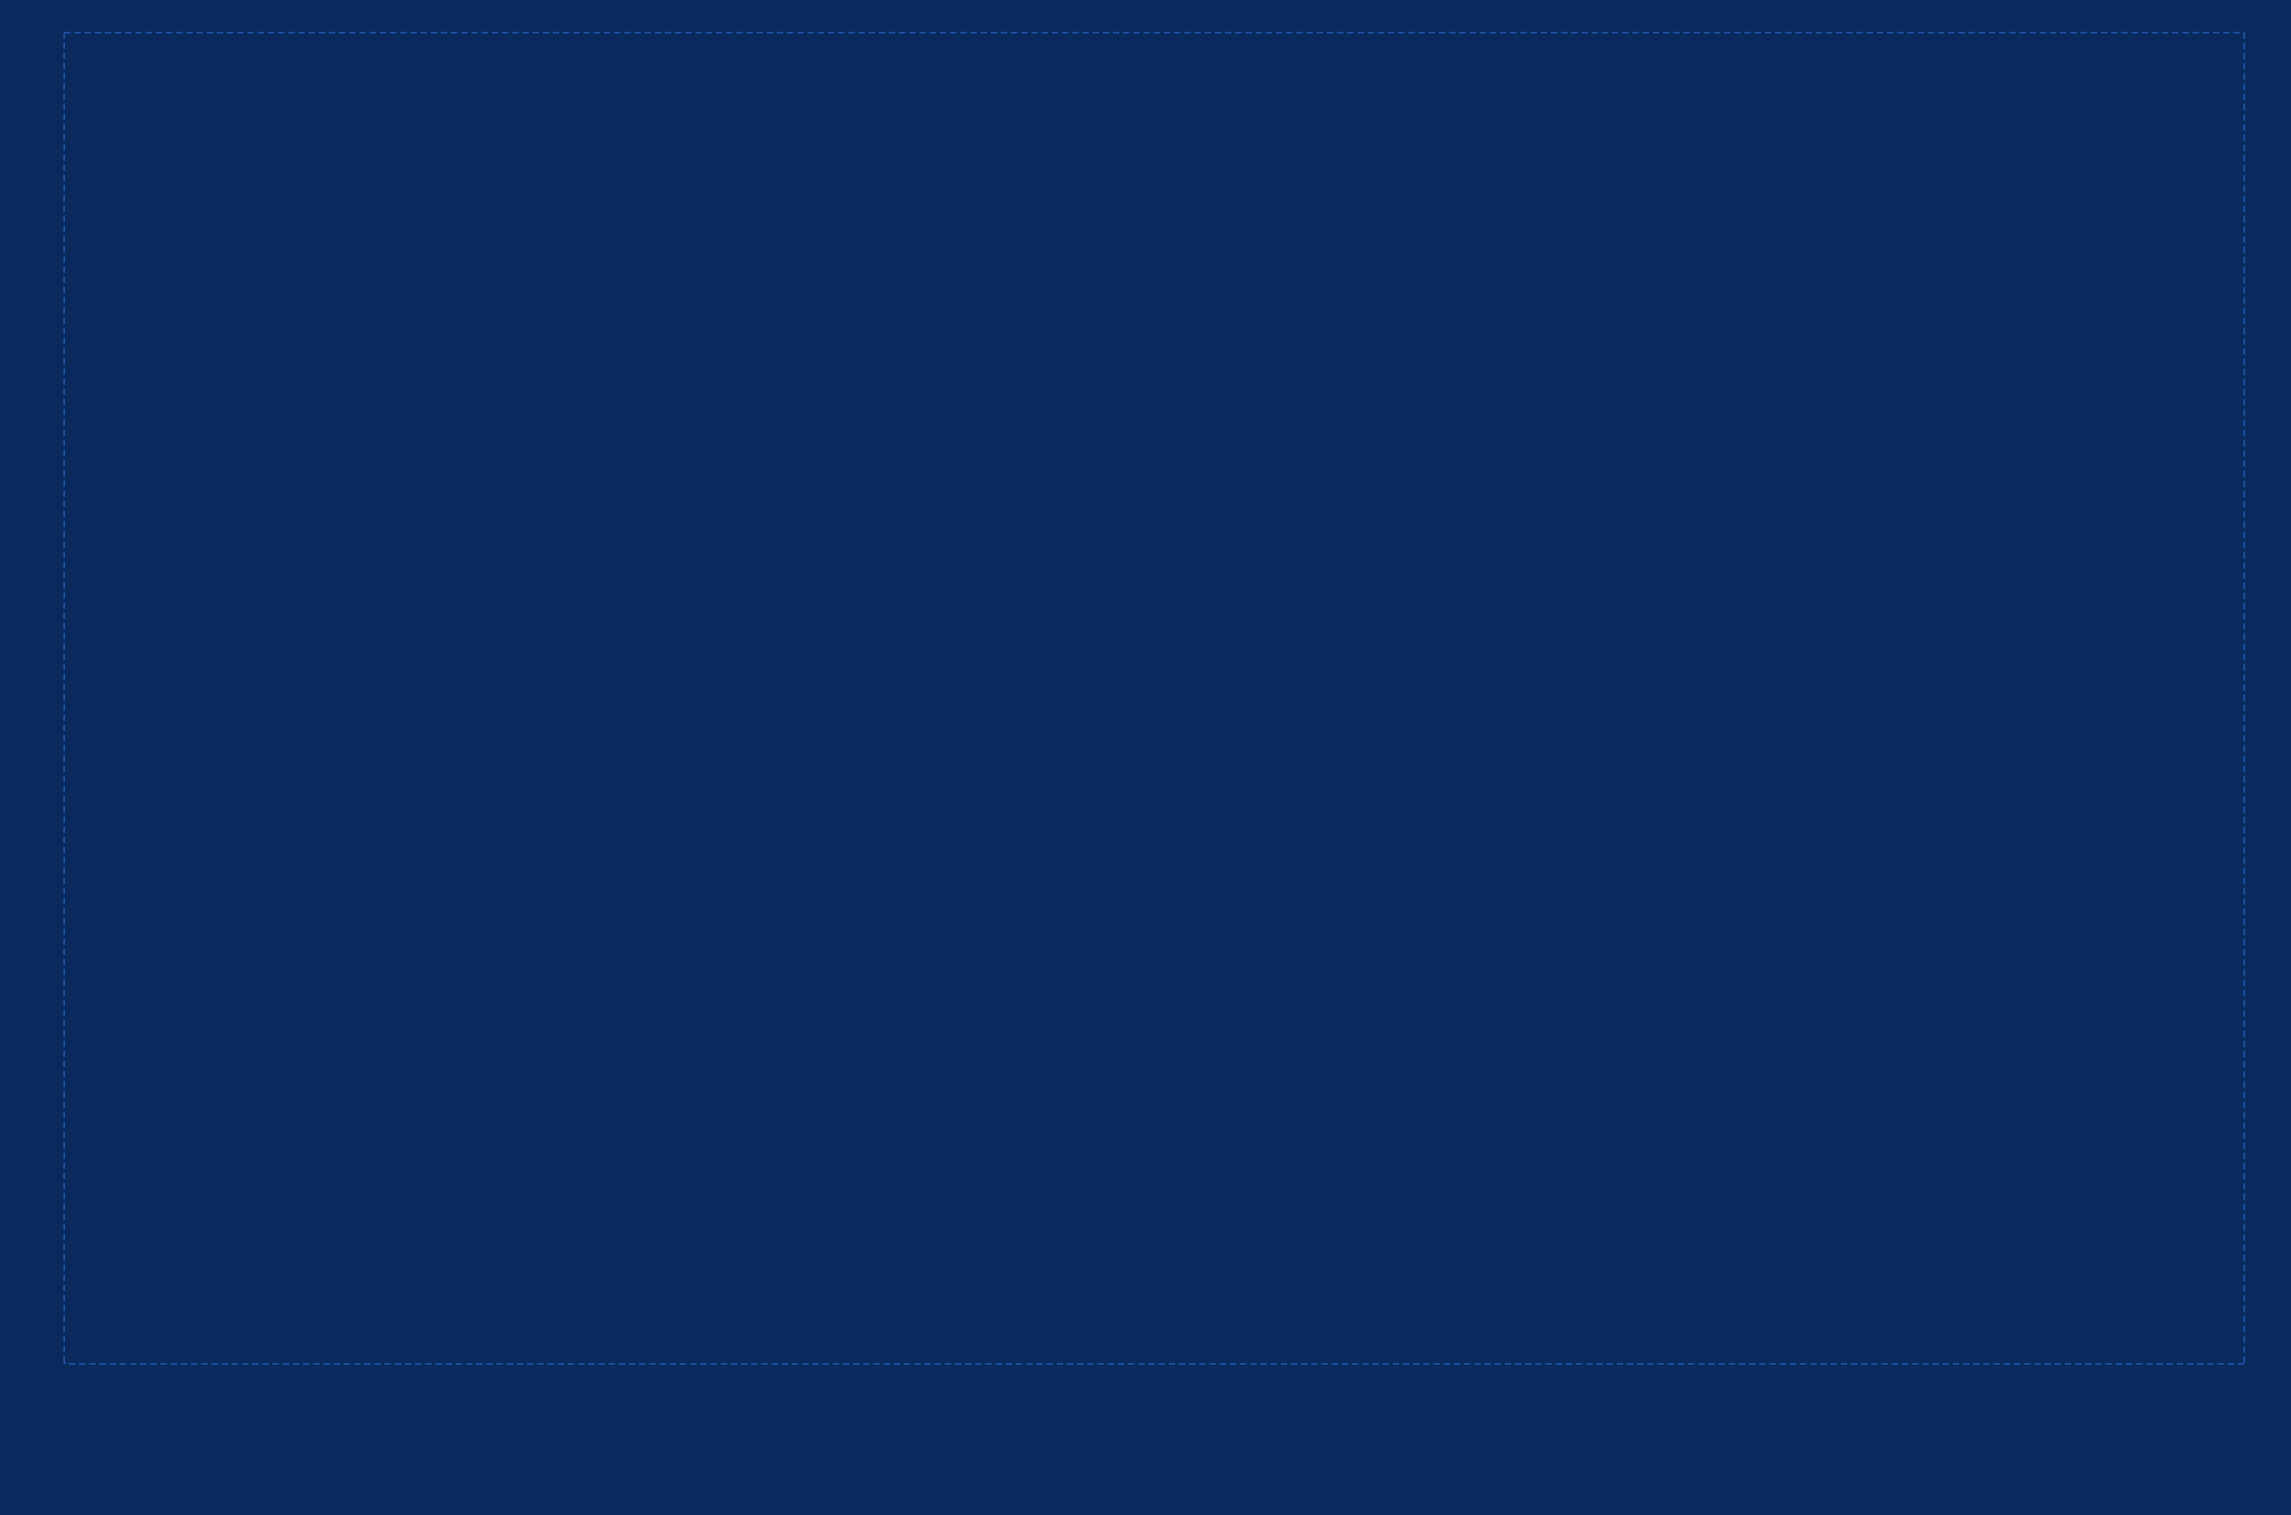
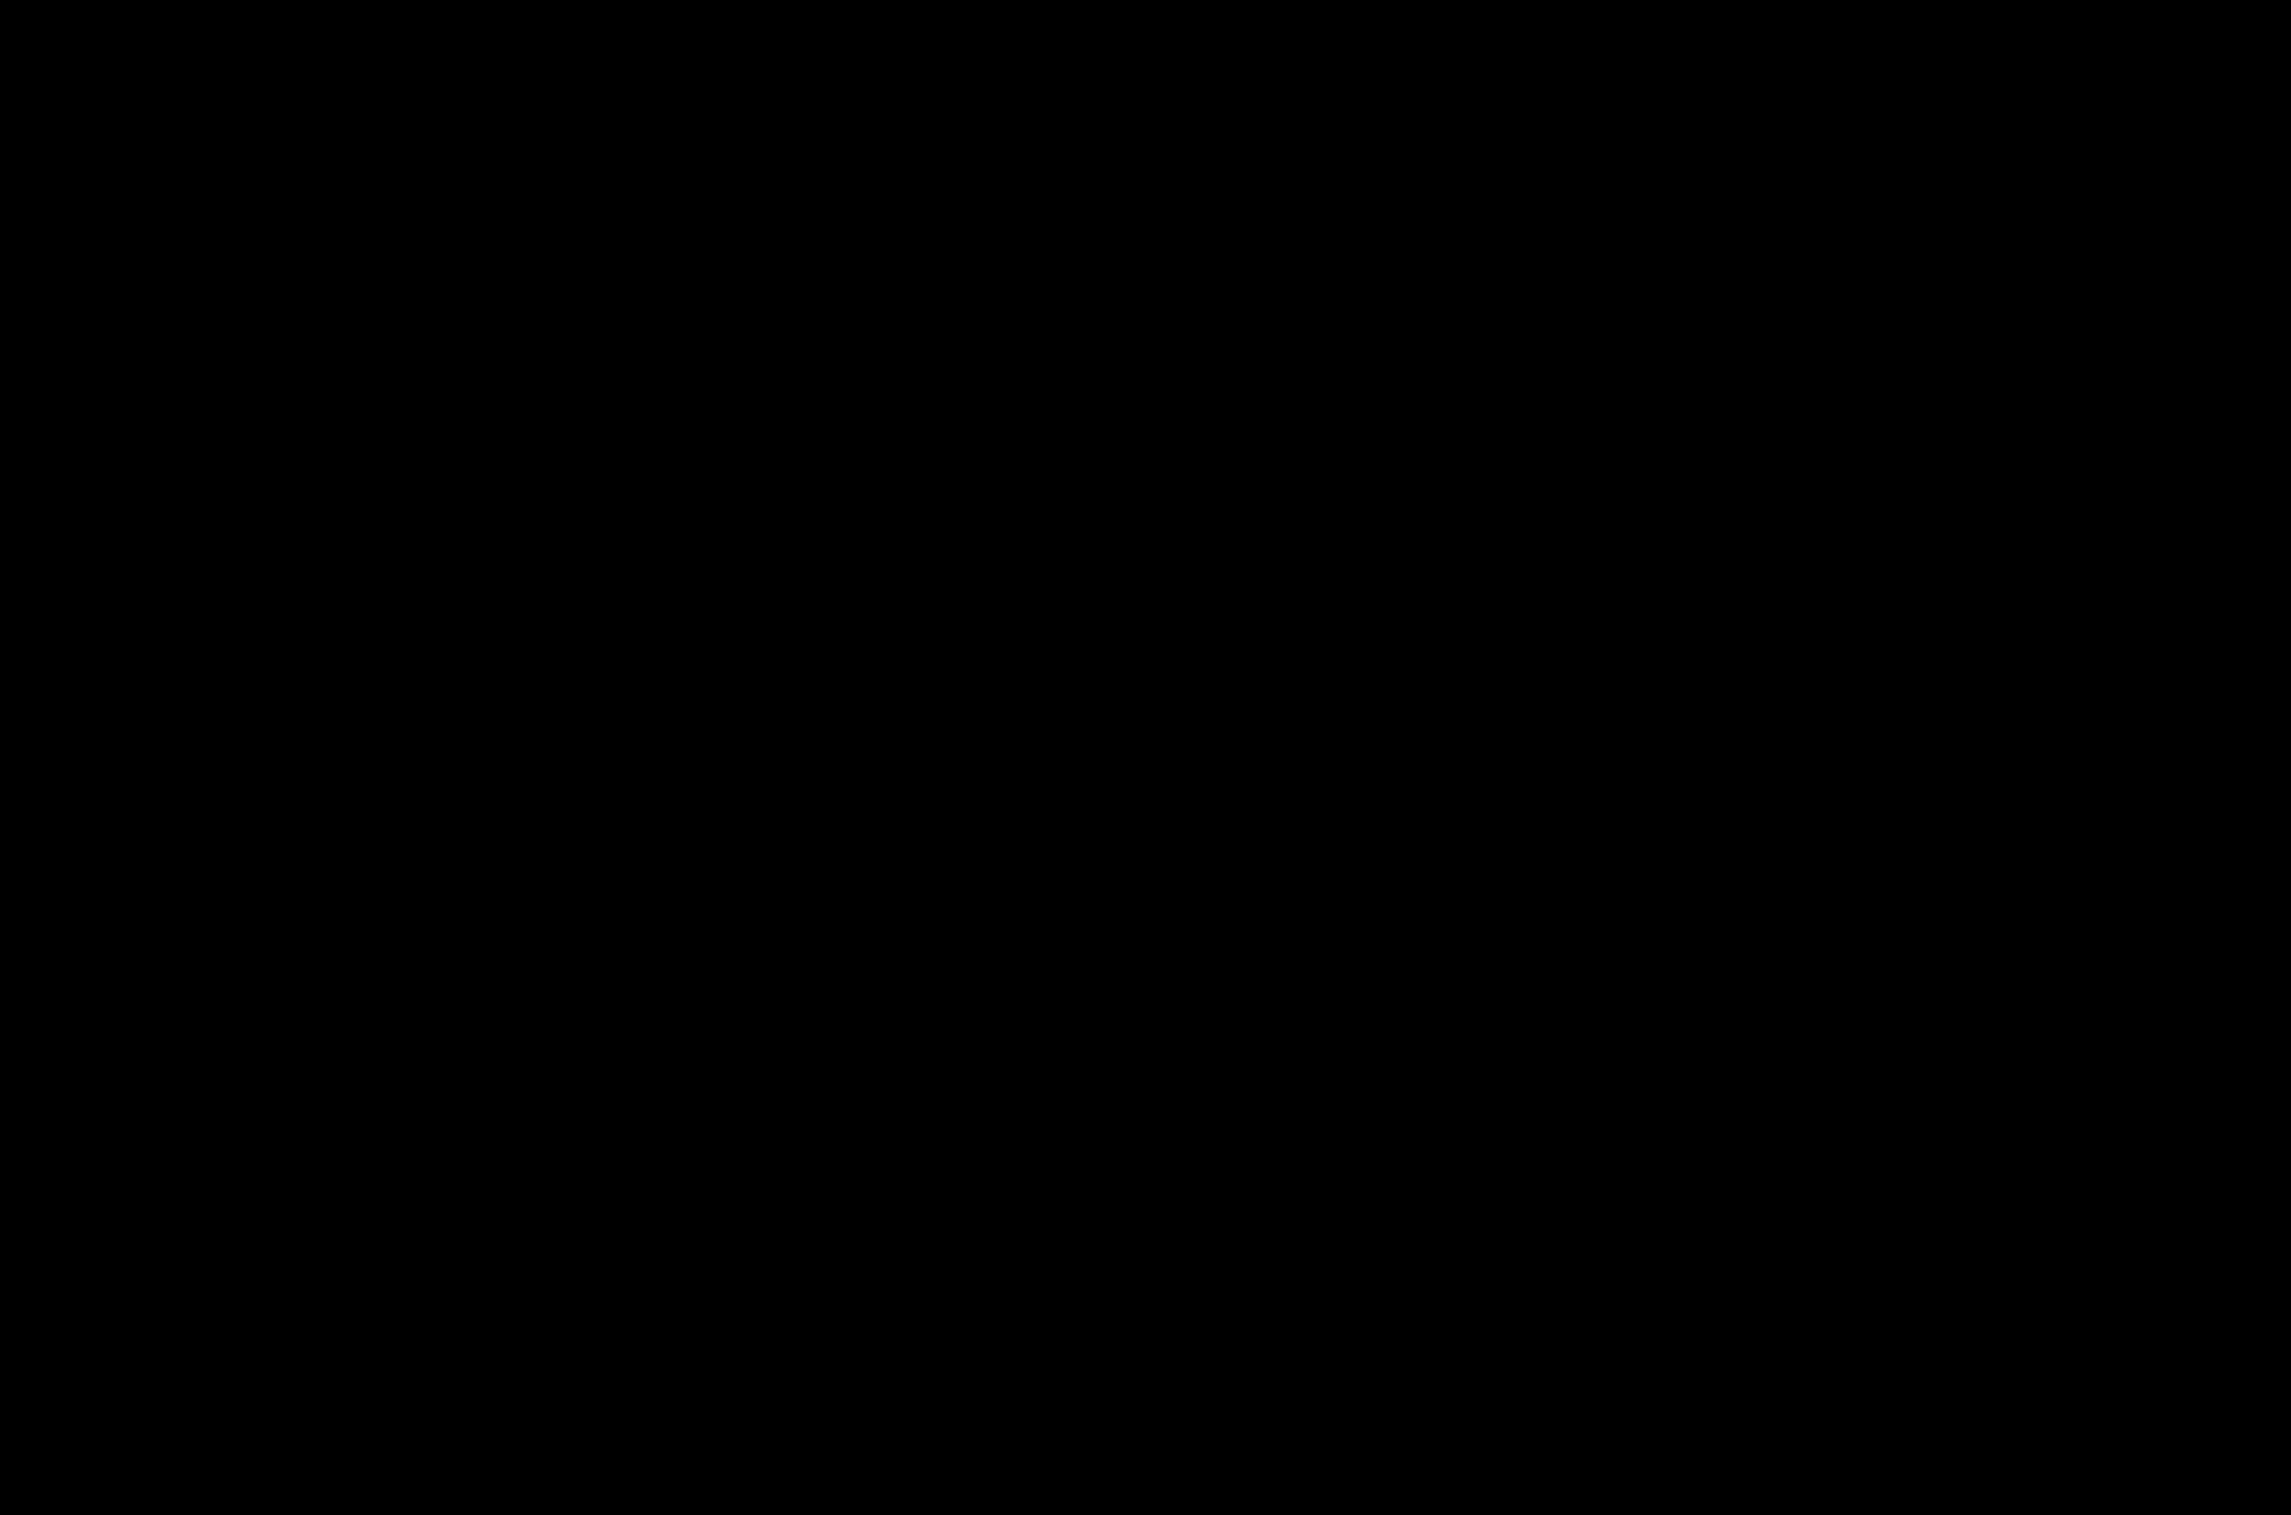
zone outline: (2244, 32) (2244, 1363) (64, 1362) (64, 32) (2244, 32) -> none

